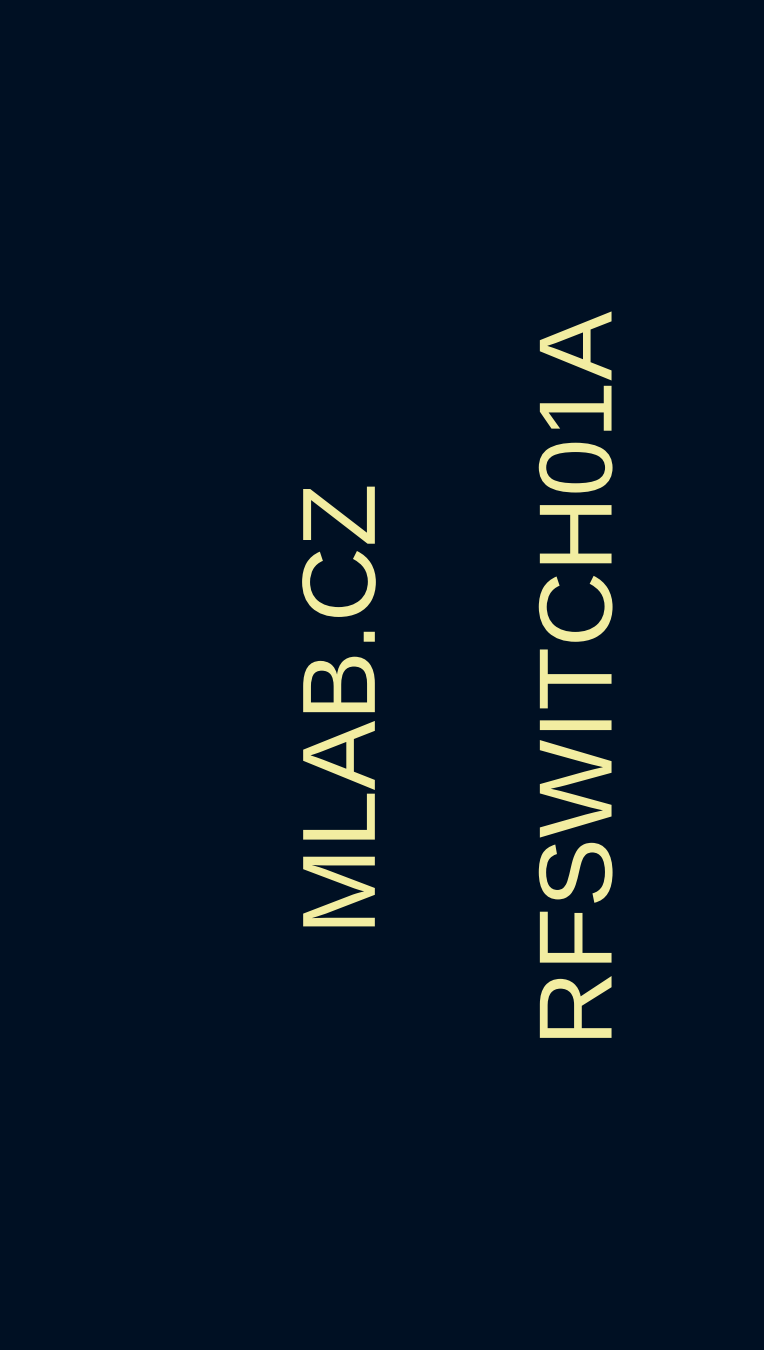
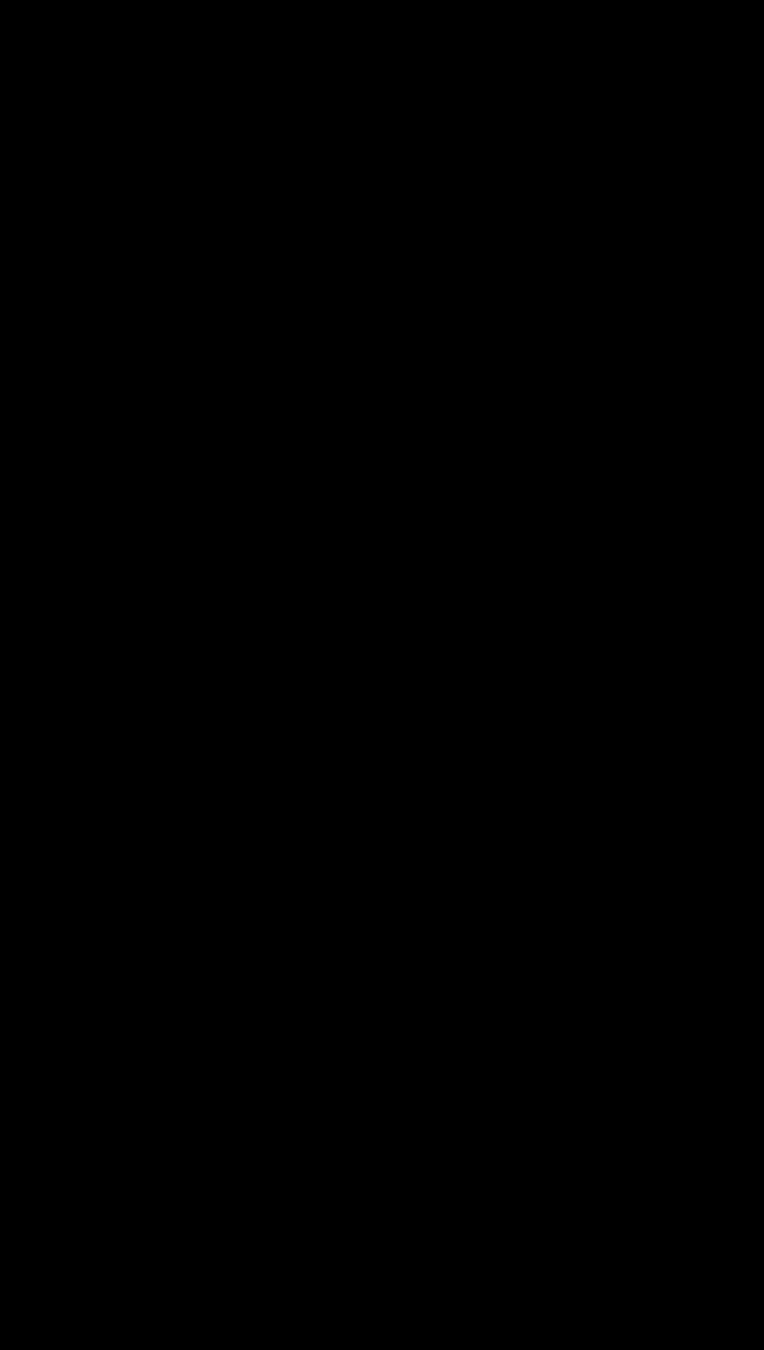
text: RFSWITCH01A (575, 674) -> none
text: MLAB.CZ (338, 706) -> none

